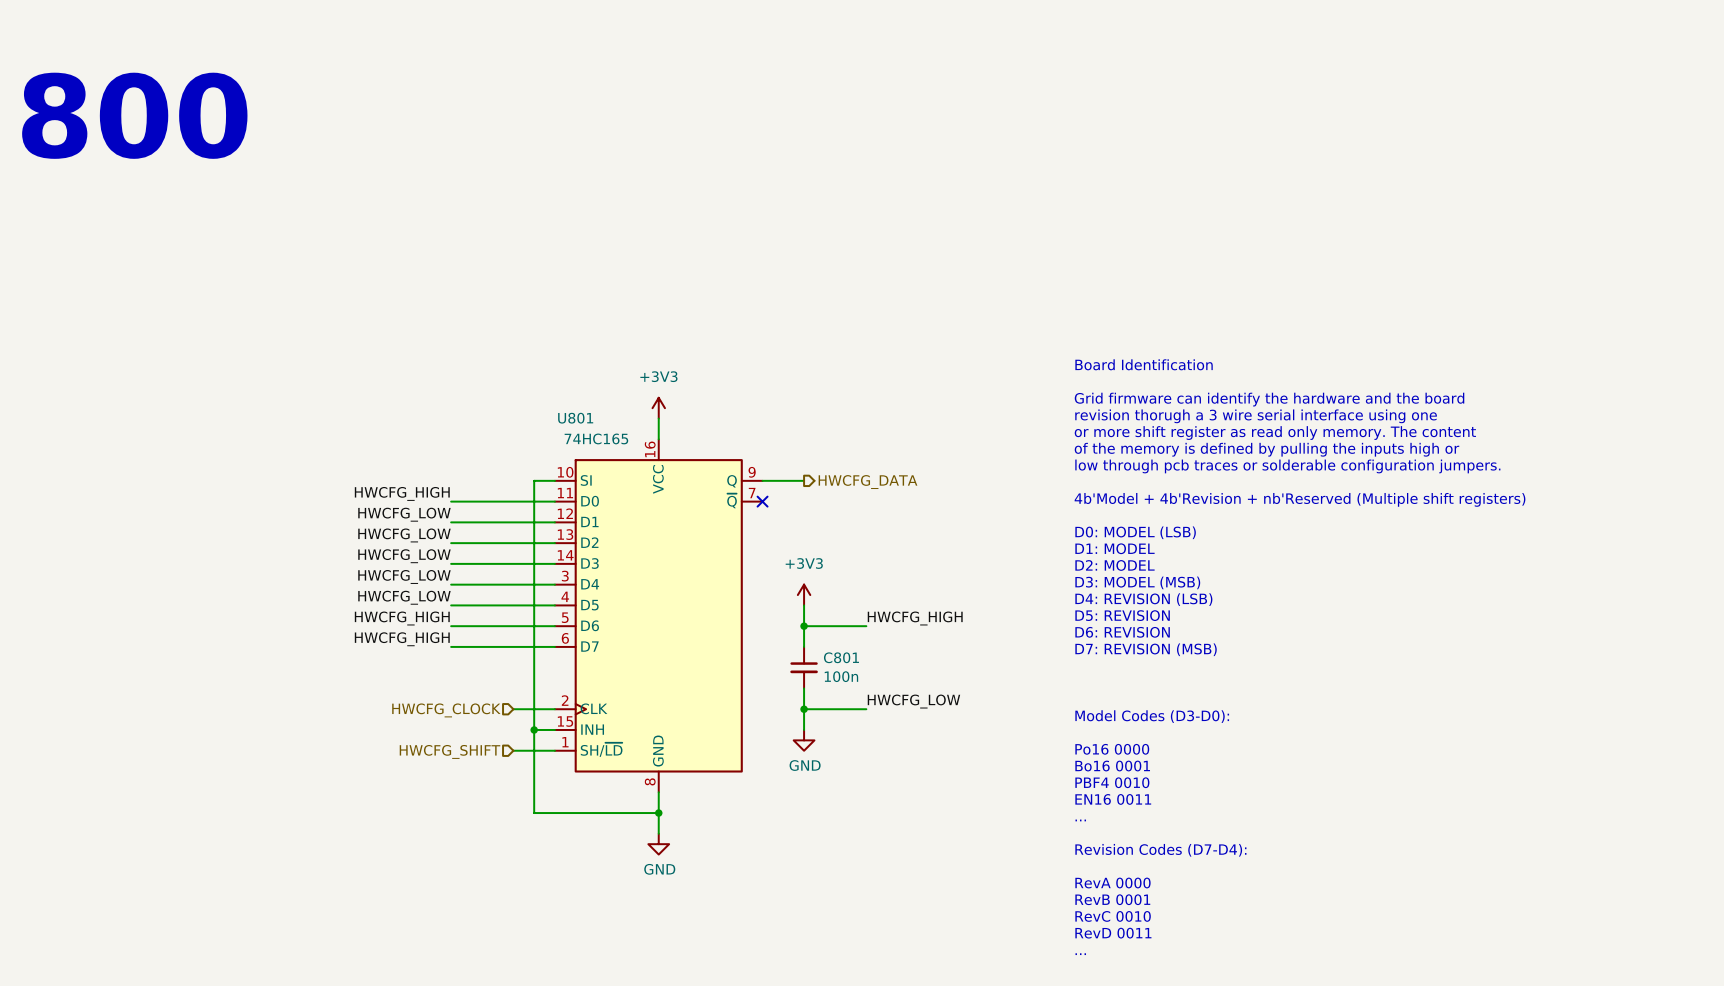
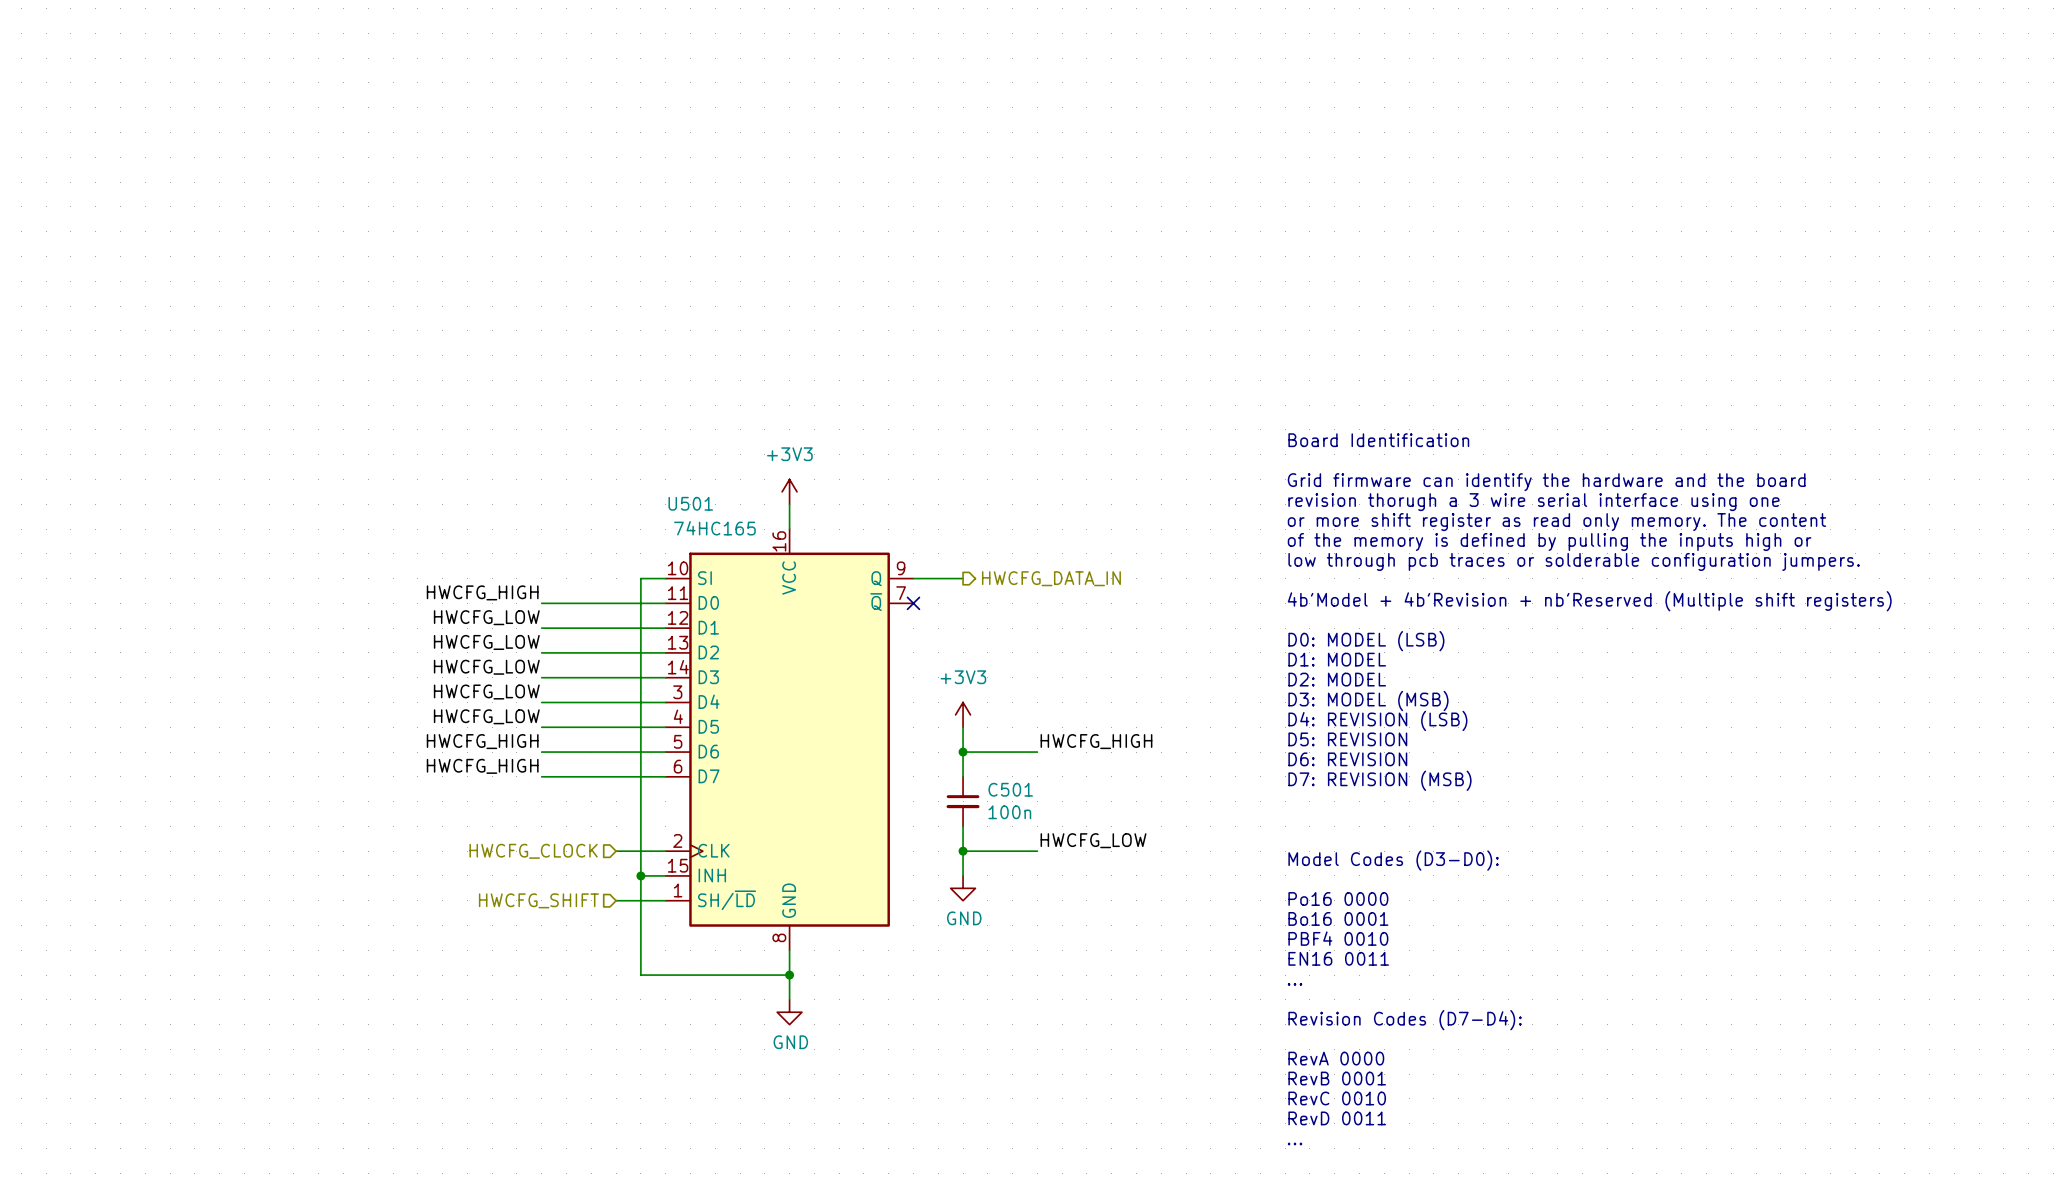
text: 800 (134, 115) -> none
U801 name: U801 (575, 418) -> U501 (690, 503)
hierarchical label: HWCFG_DATA (868, 482) -> HWCFG_DATA_IN (1051, 578)
C801 name: C801 (841, 657) -> C501 (1010, 789)

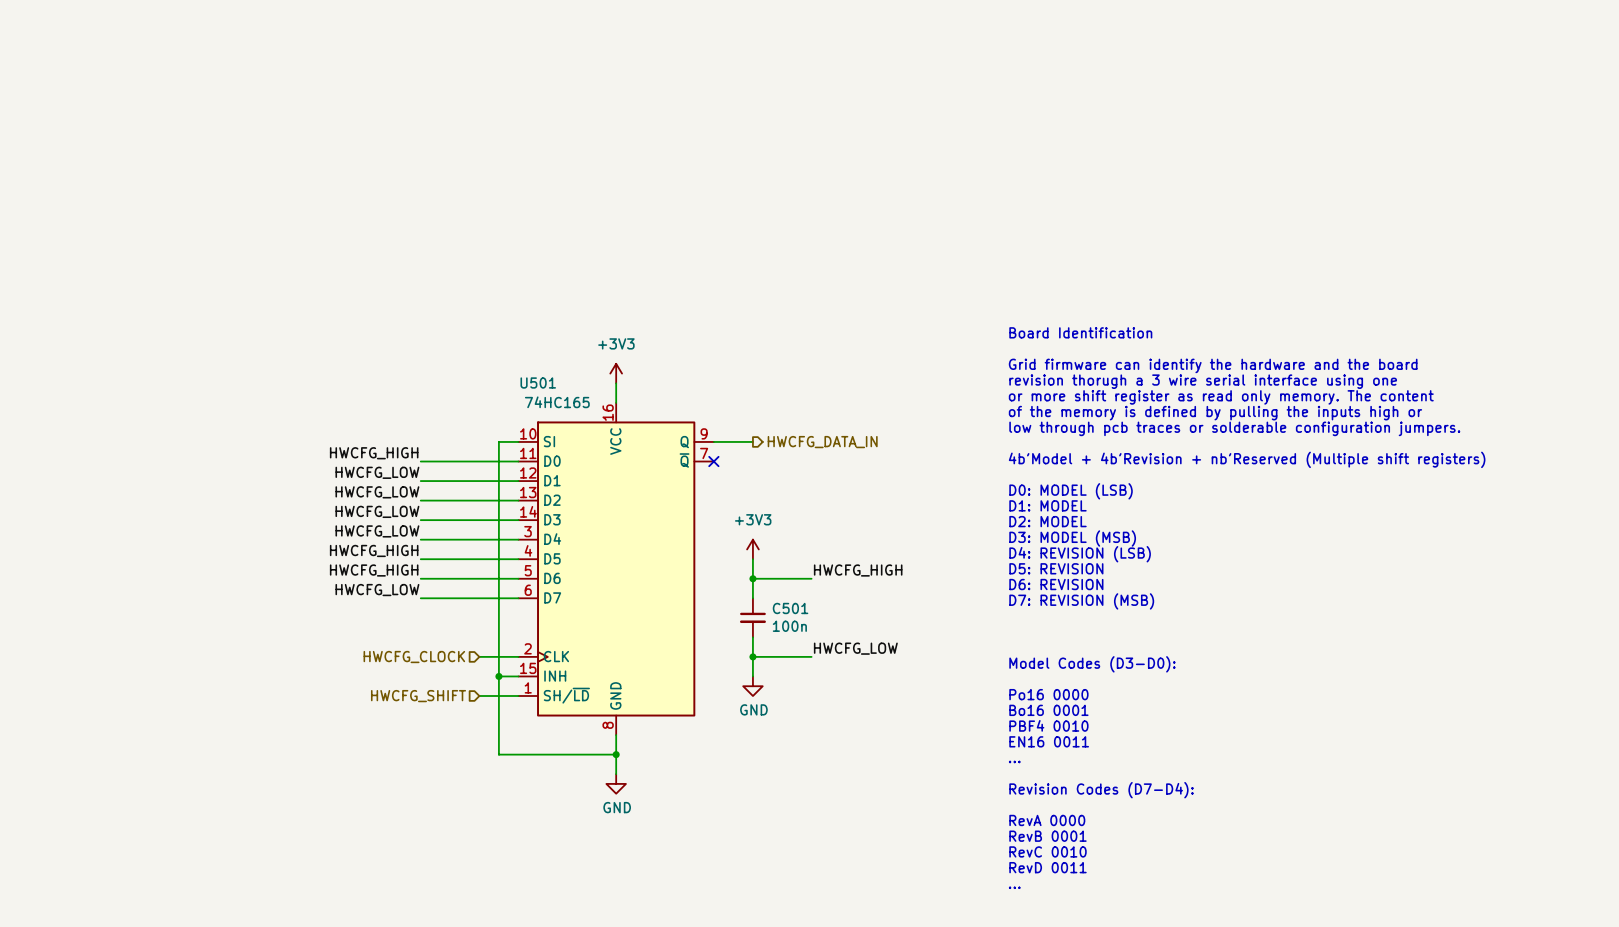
label: HWCFG_LOW (486, 716) -> HWCFG_HIGH (374, 550)
label: HWCFG_HIGH (482, 766) -> HWCFG_LOW (377, 590)

